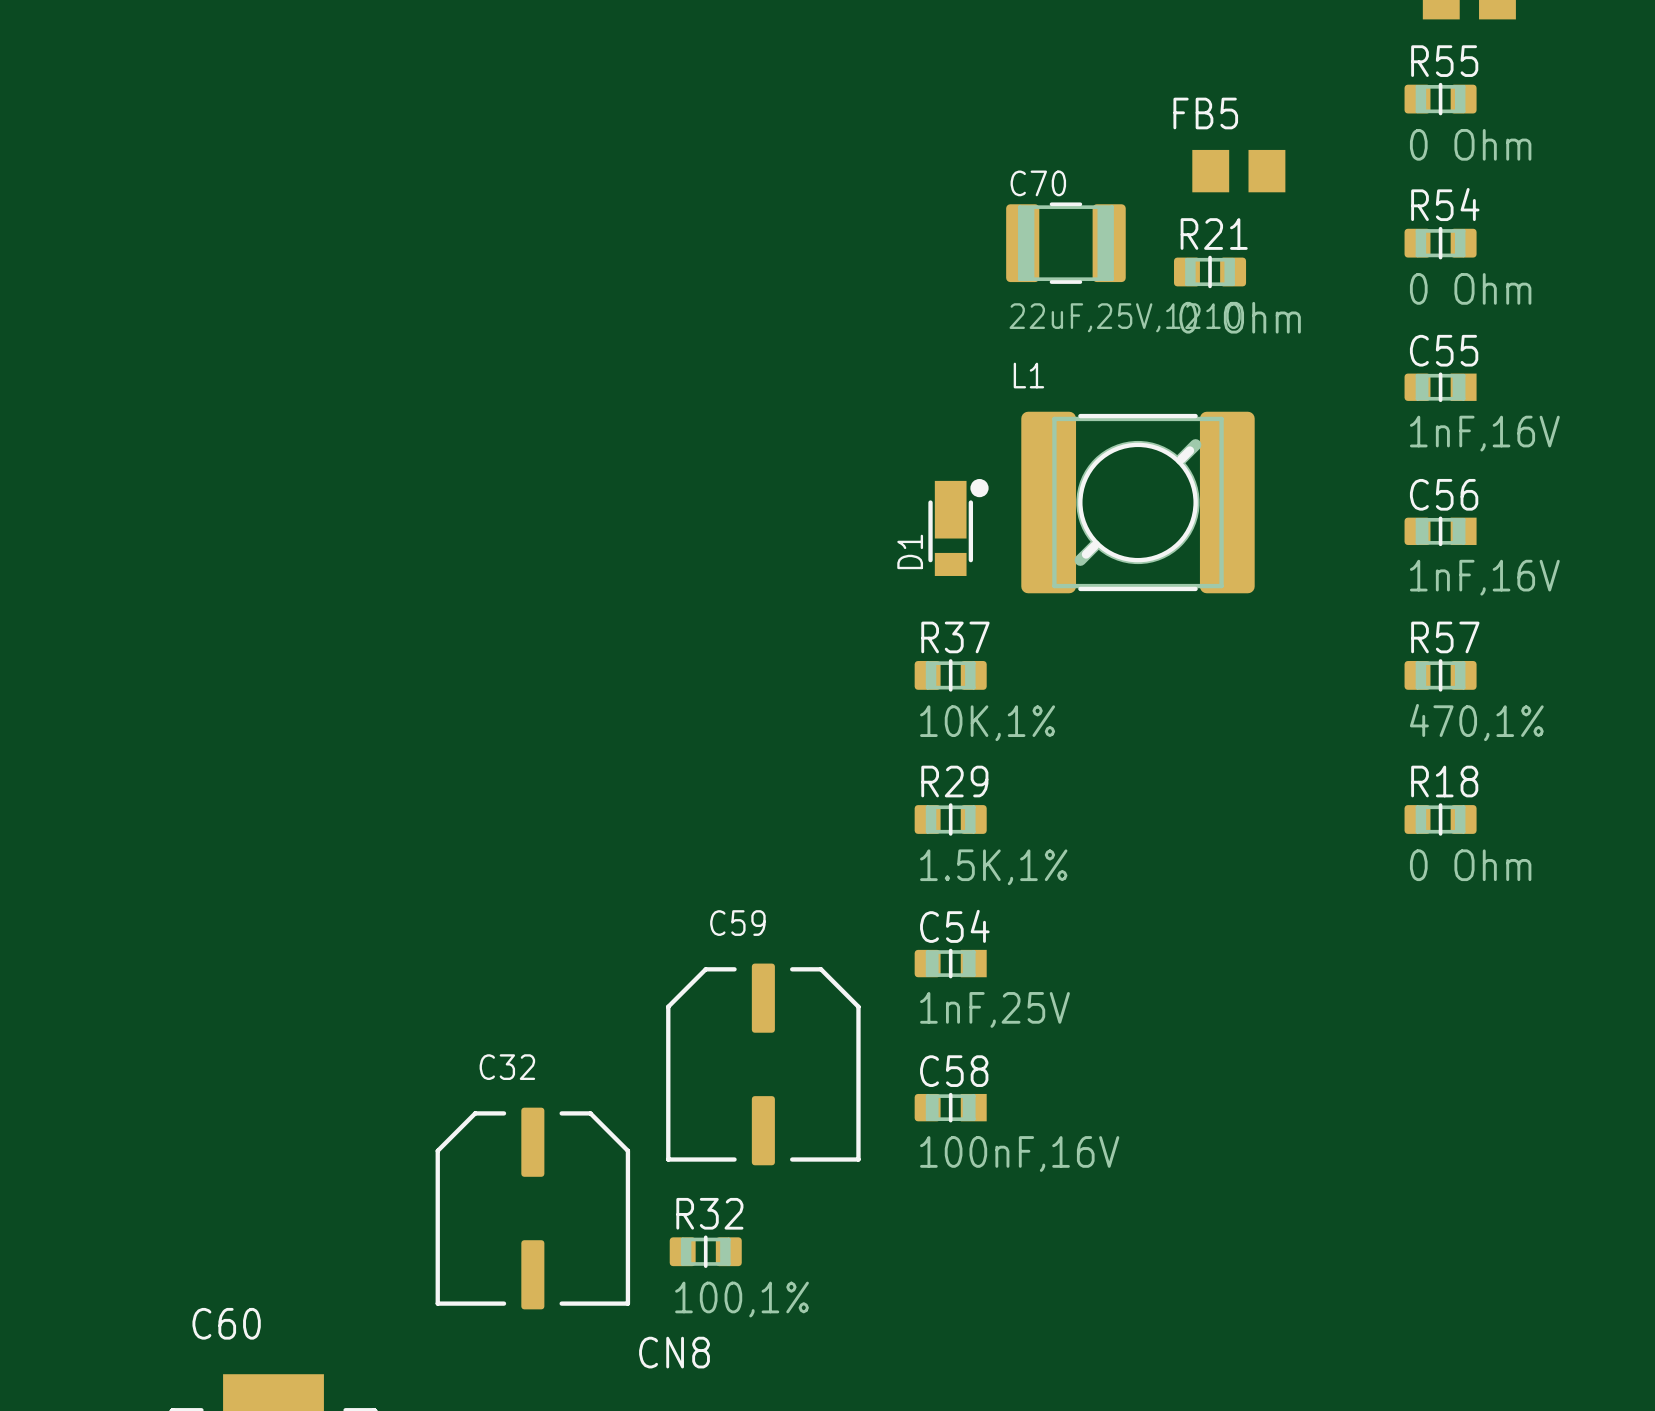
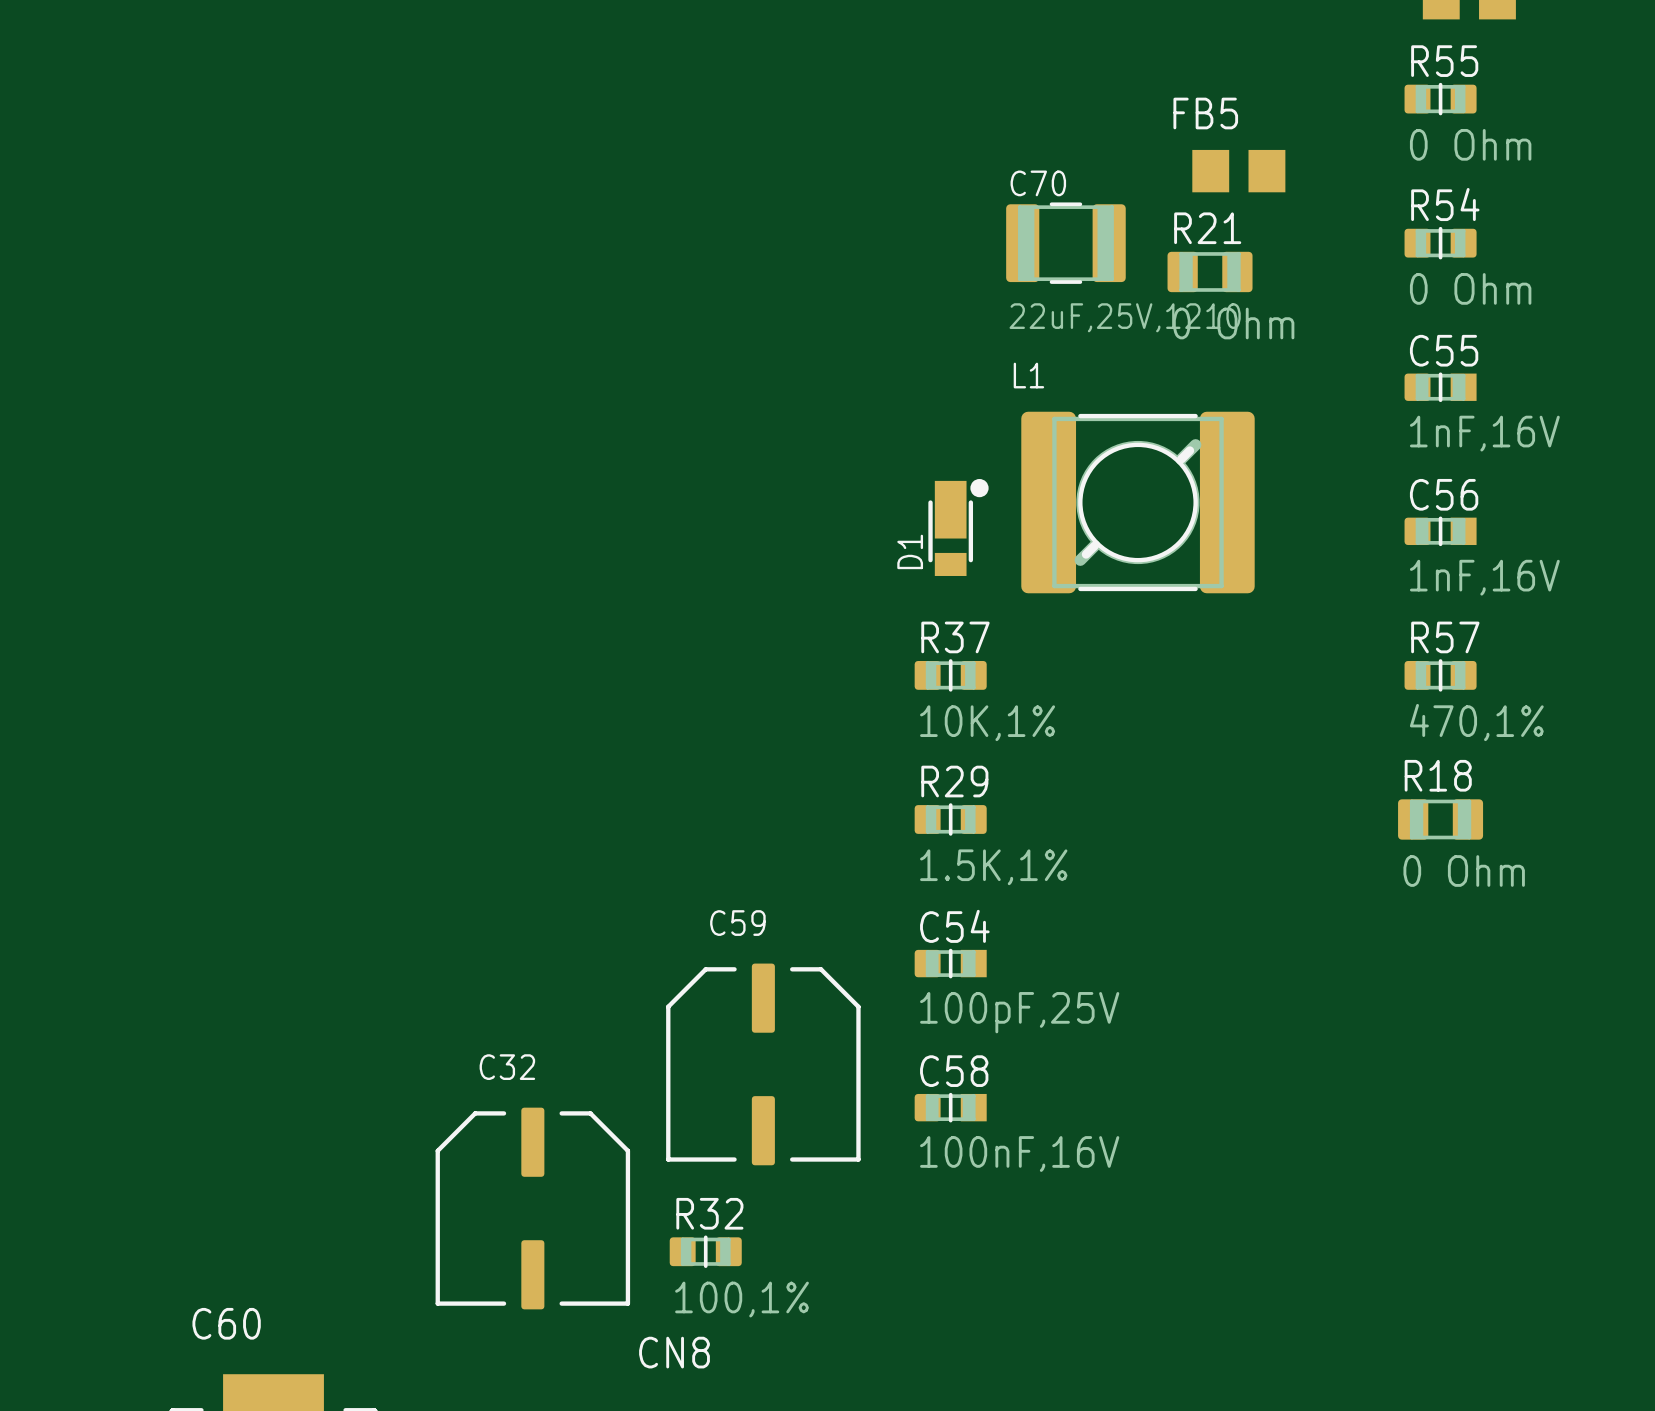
R21 footprint: [1174, 255, 1247, 289] -> [1167, 251, 1253, 293]
R18 footprint: [1404, 803, 1477, 836] -> [1398, 799, 1484, 840]
C54 value: 1nF,25V (994, 1009) -> 100pF,25V (1019, 1012)

